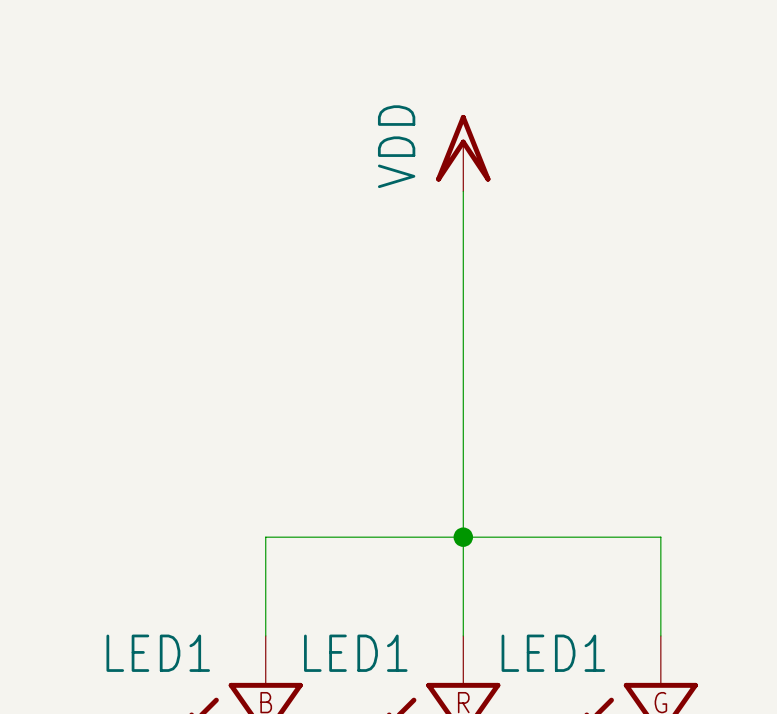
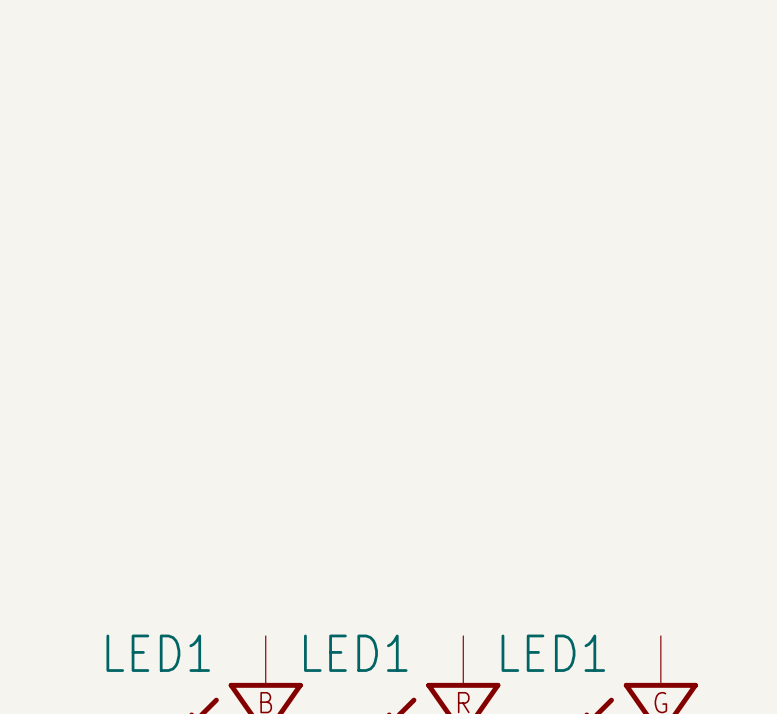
power symbol: VDD (463, 153) -> none
wire: (463, 191) (463, 635) -> none
junction: (463, 537) -> none
wire: (265, 635) (265, 537) (660, 537) (660, 635) -> none

